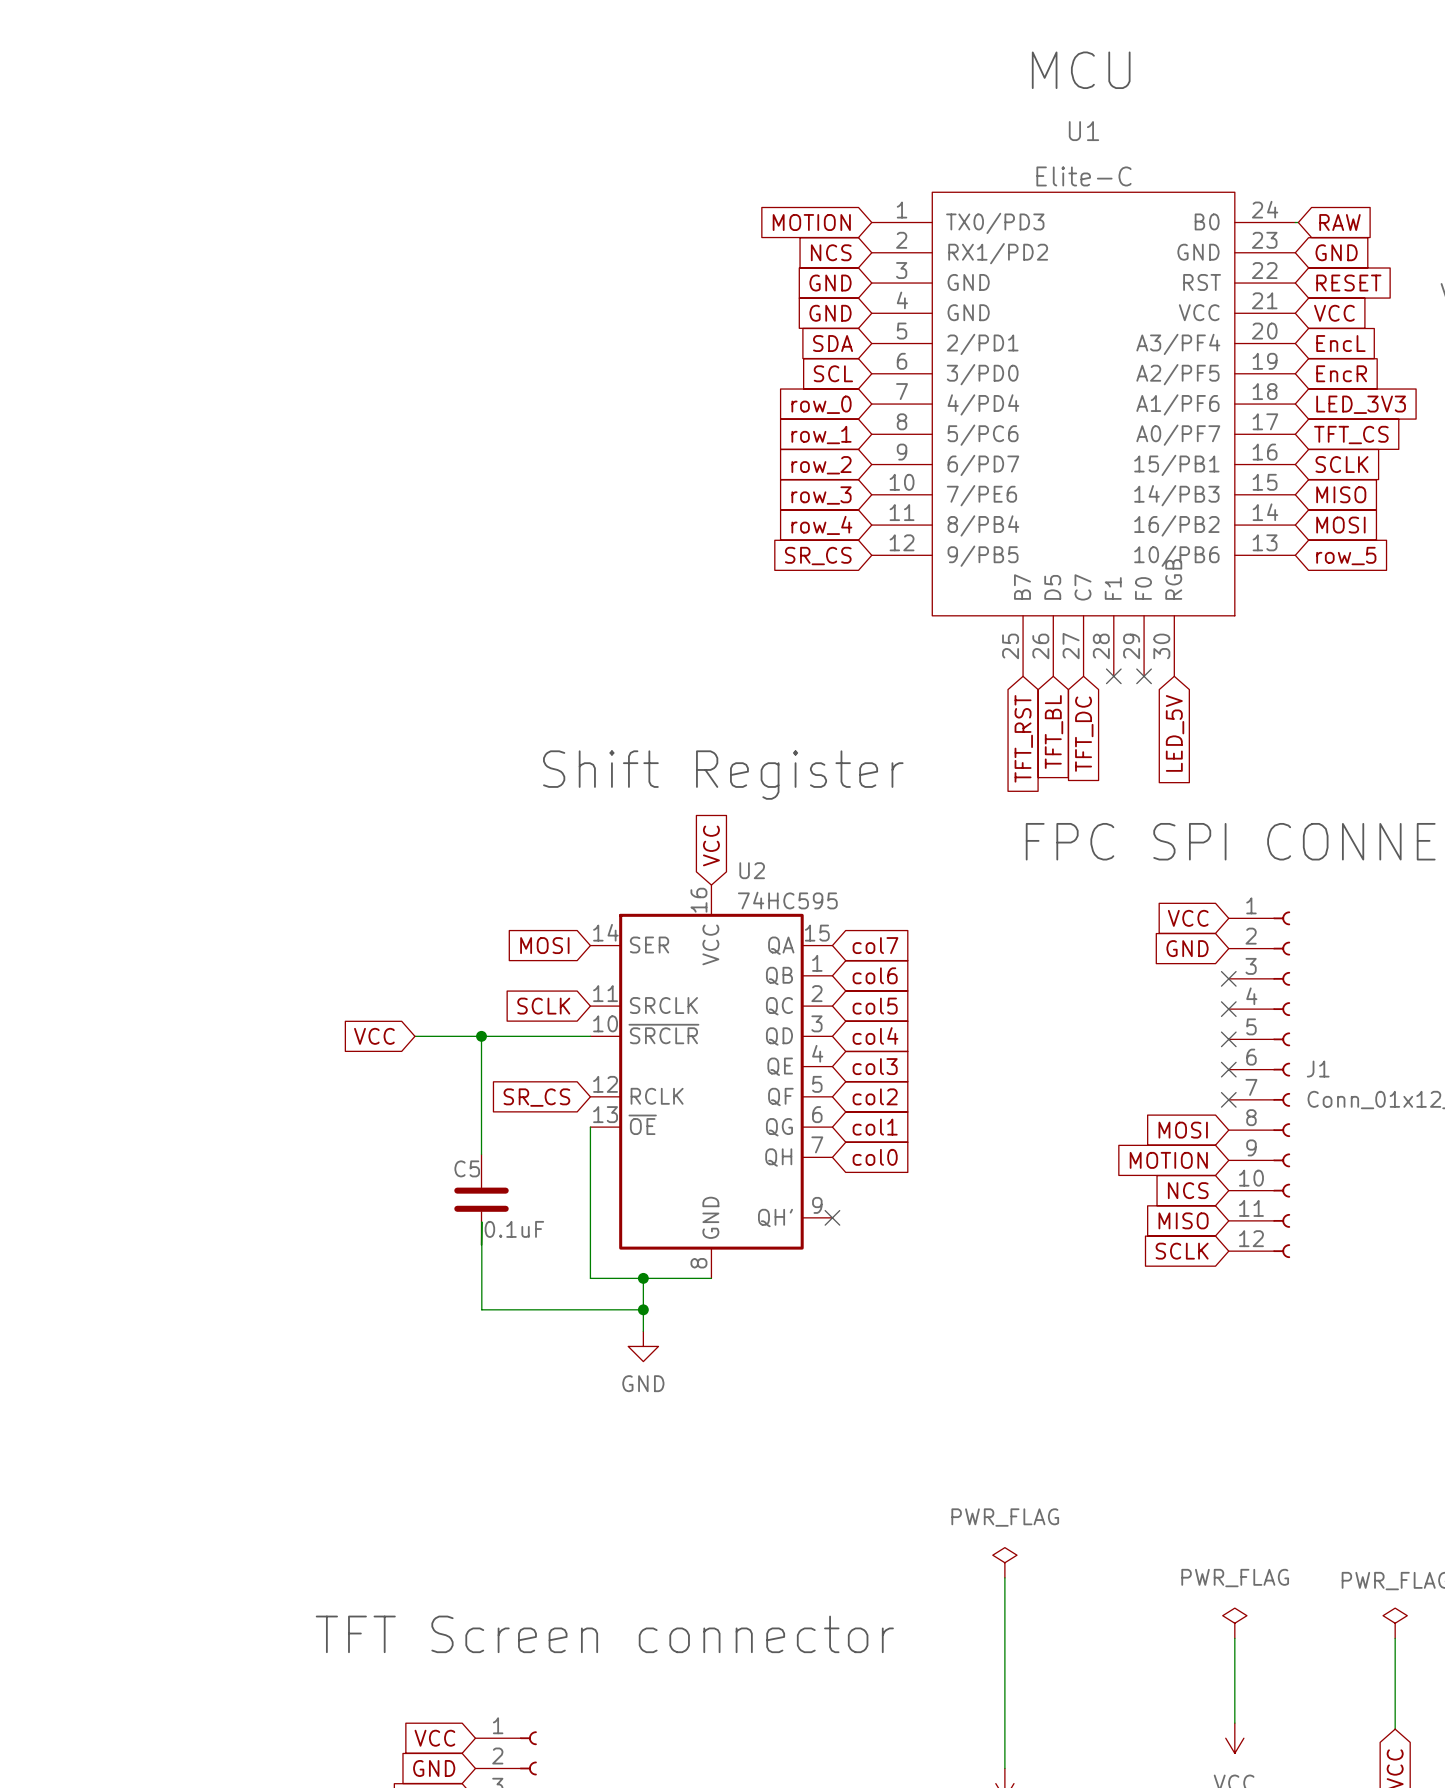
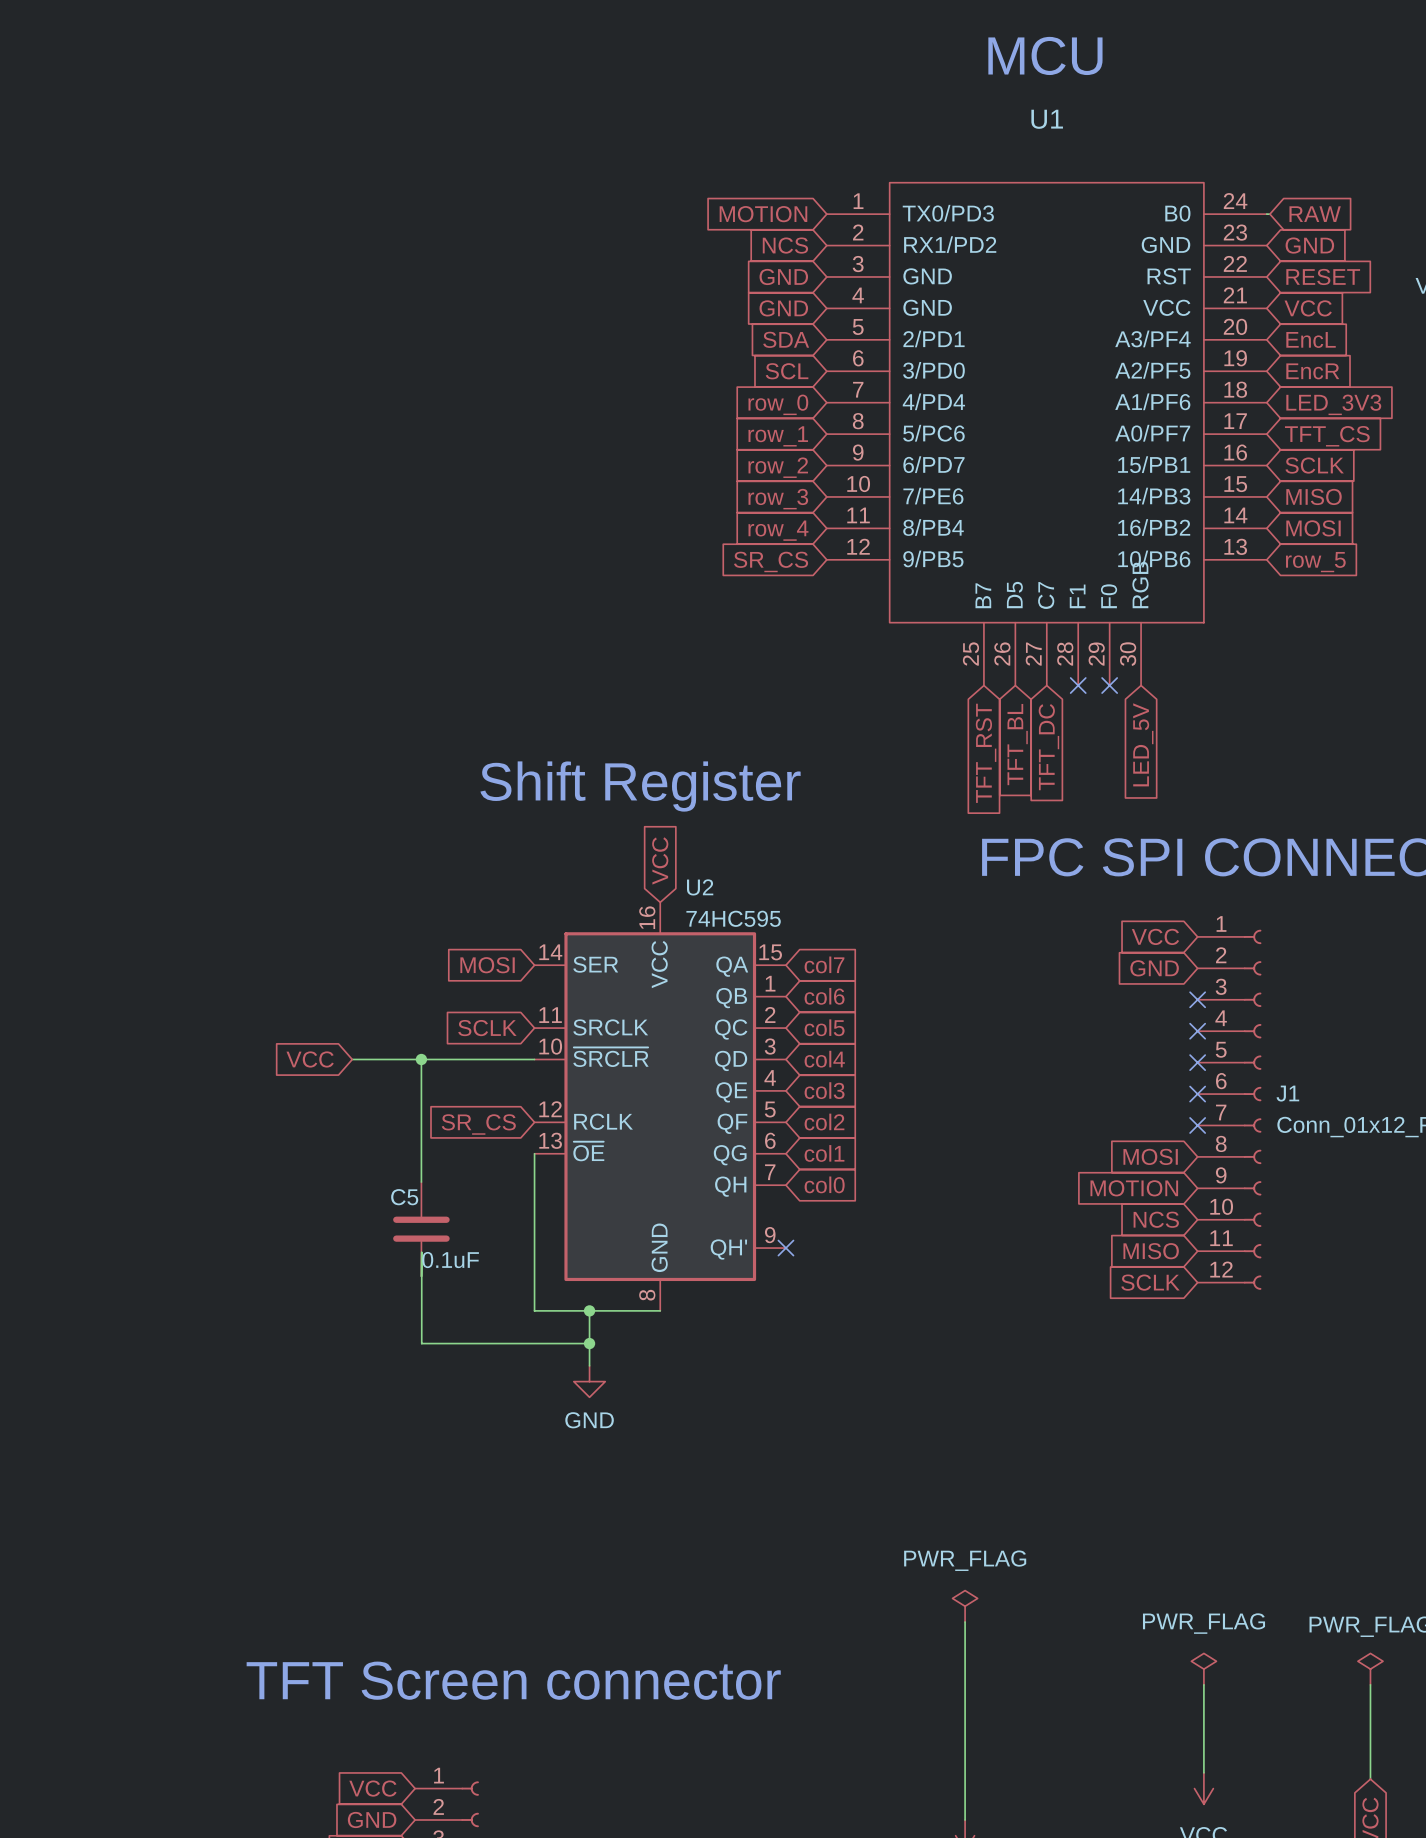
U1 value: Elite-C (1083, 176) -> none

